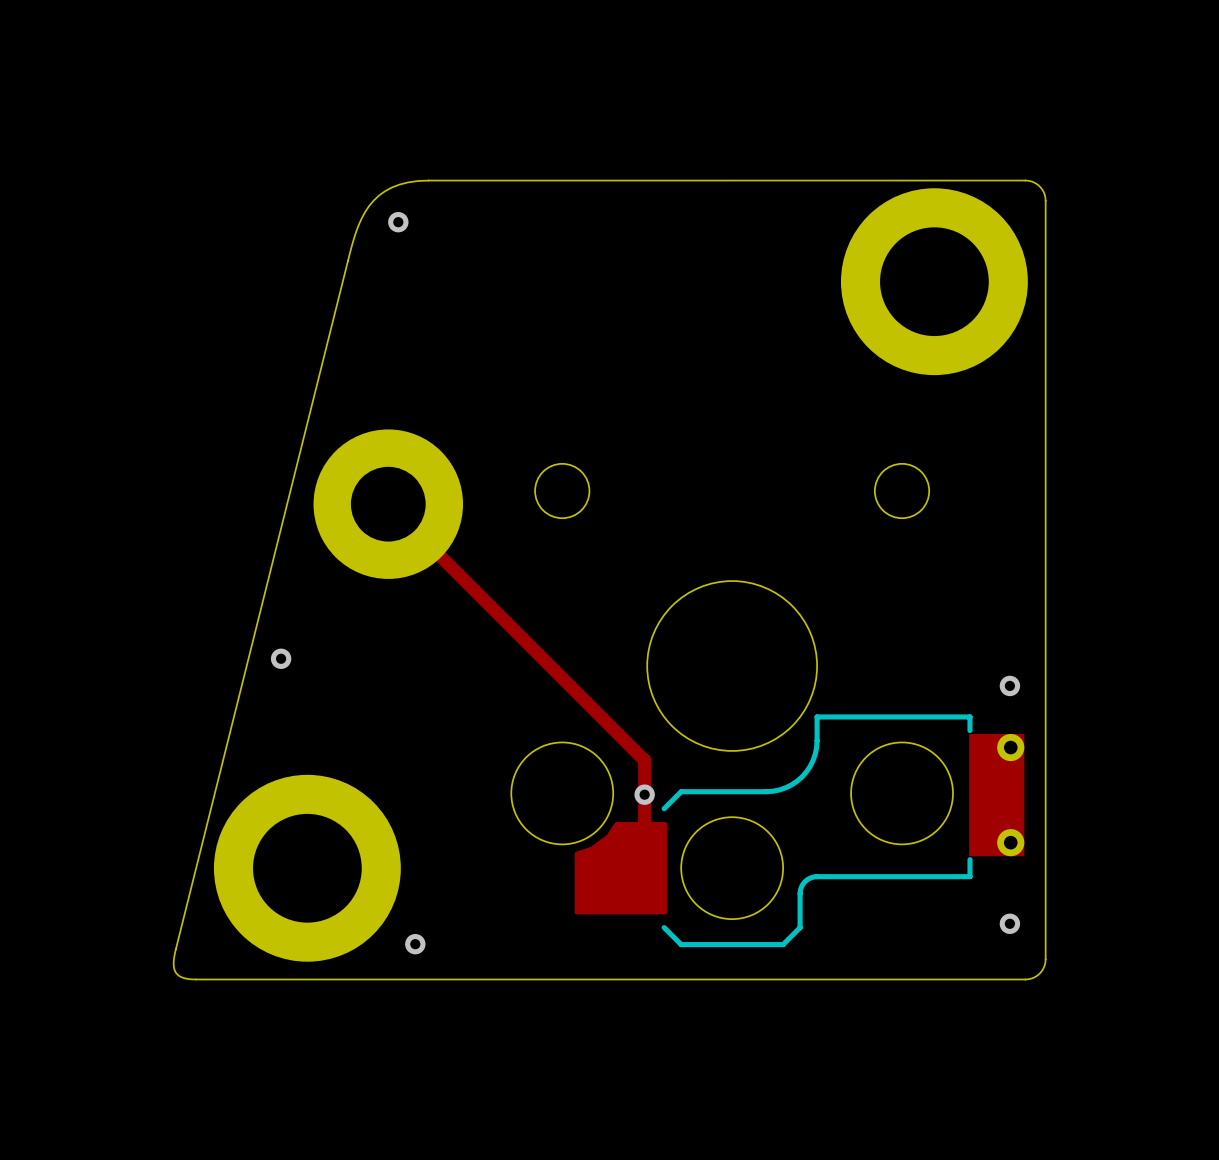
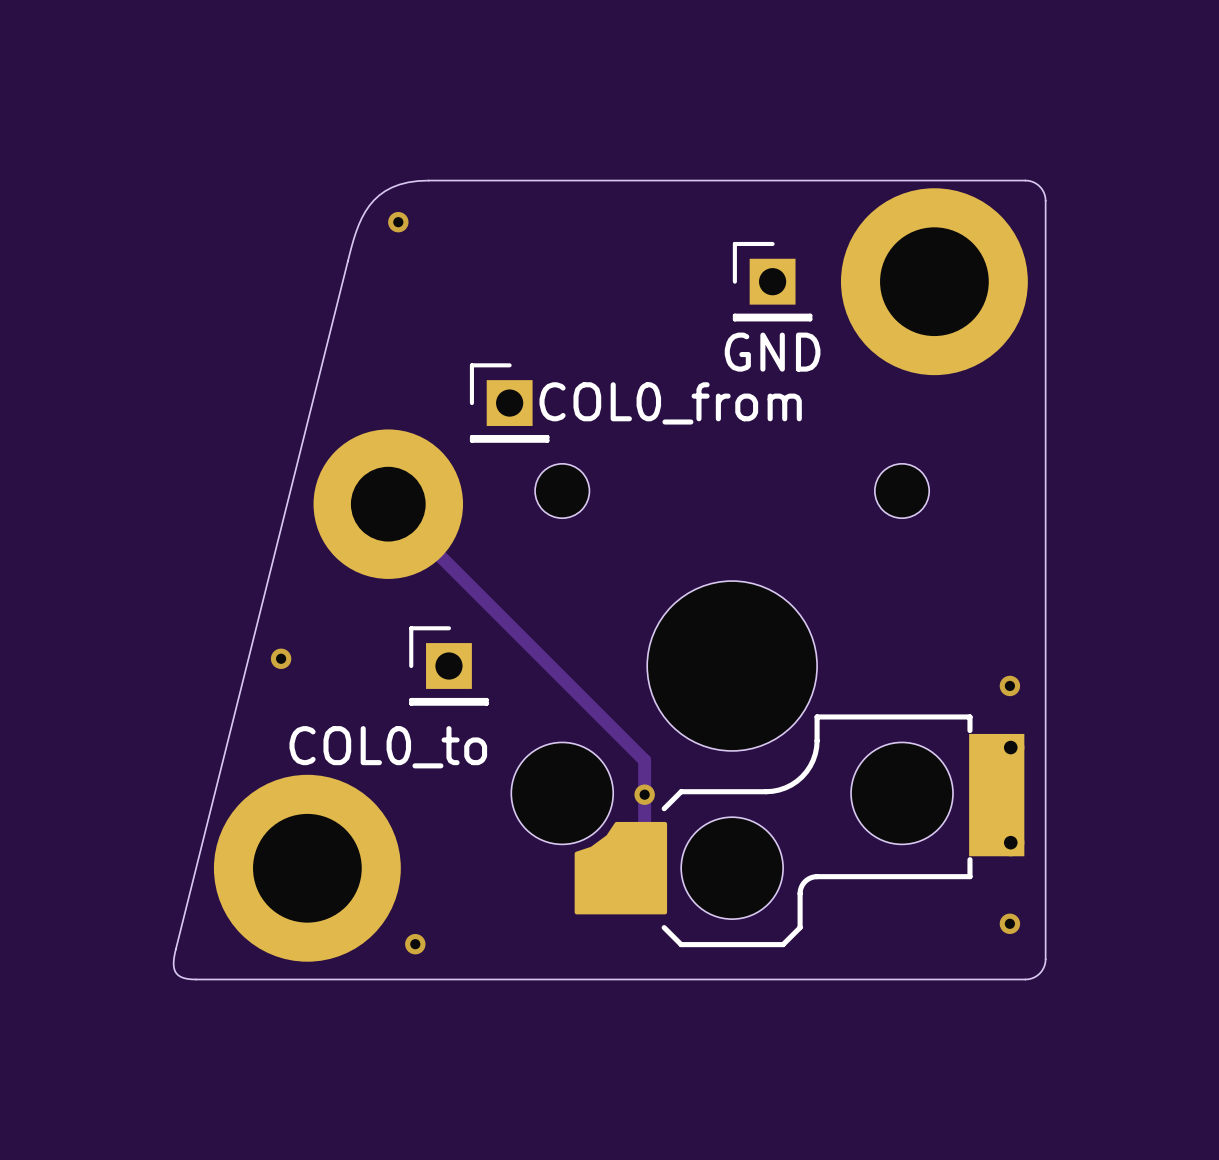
part: none -> GND (772, 281)
part: none -> COL0_from (509, 403)
part: none -> COL0_to (448, 666)

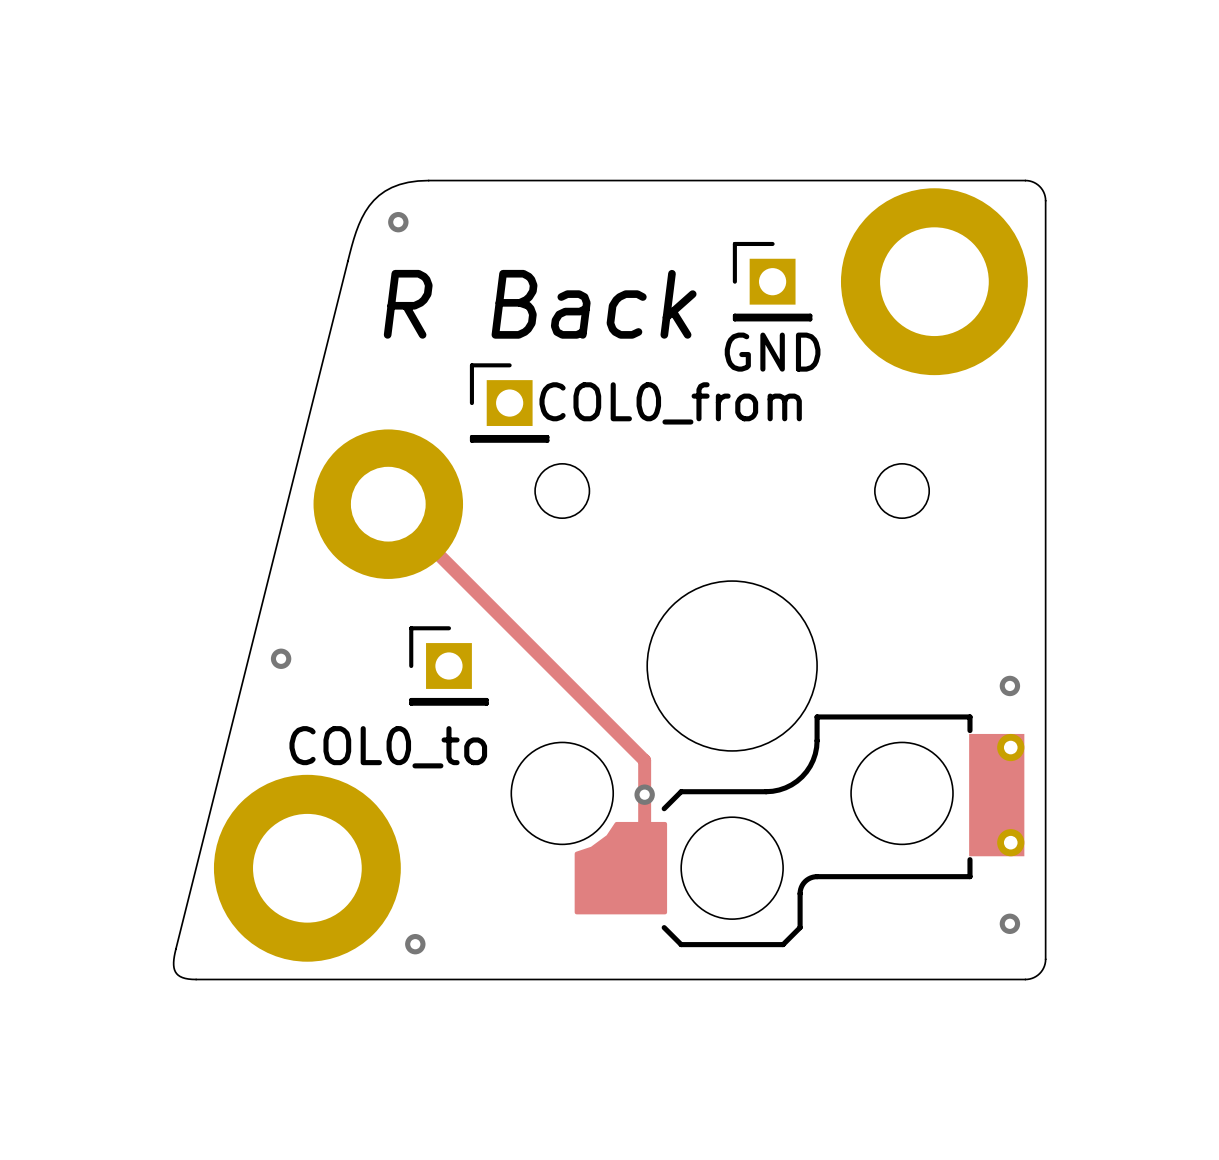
text: none -> R Back (540, 304)

